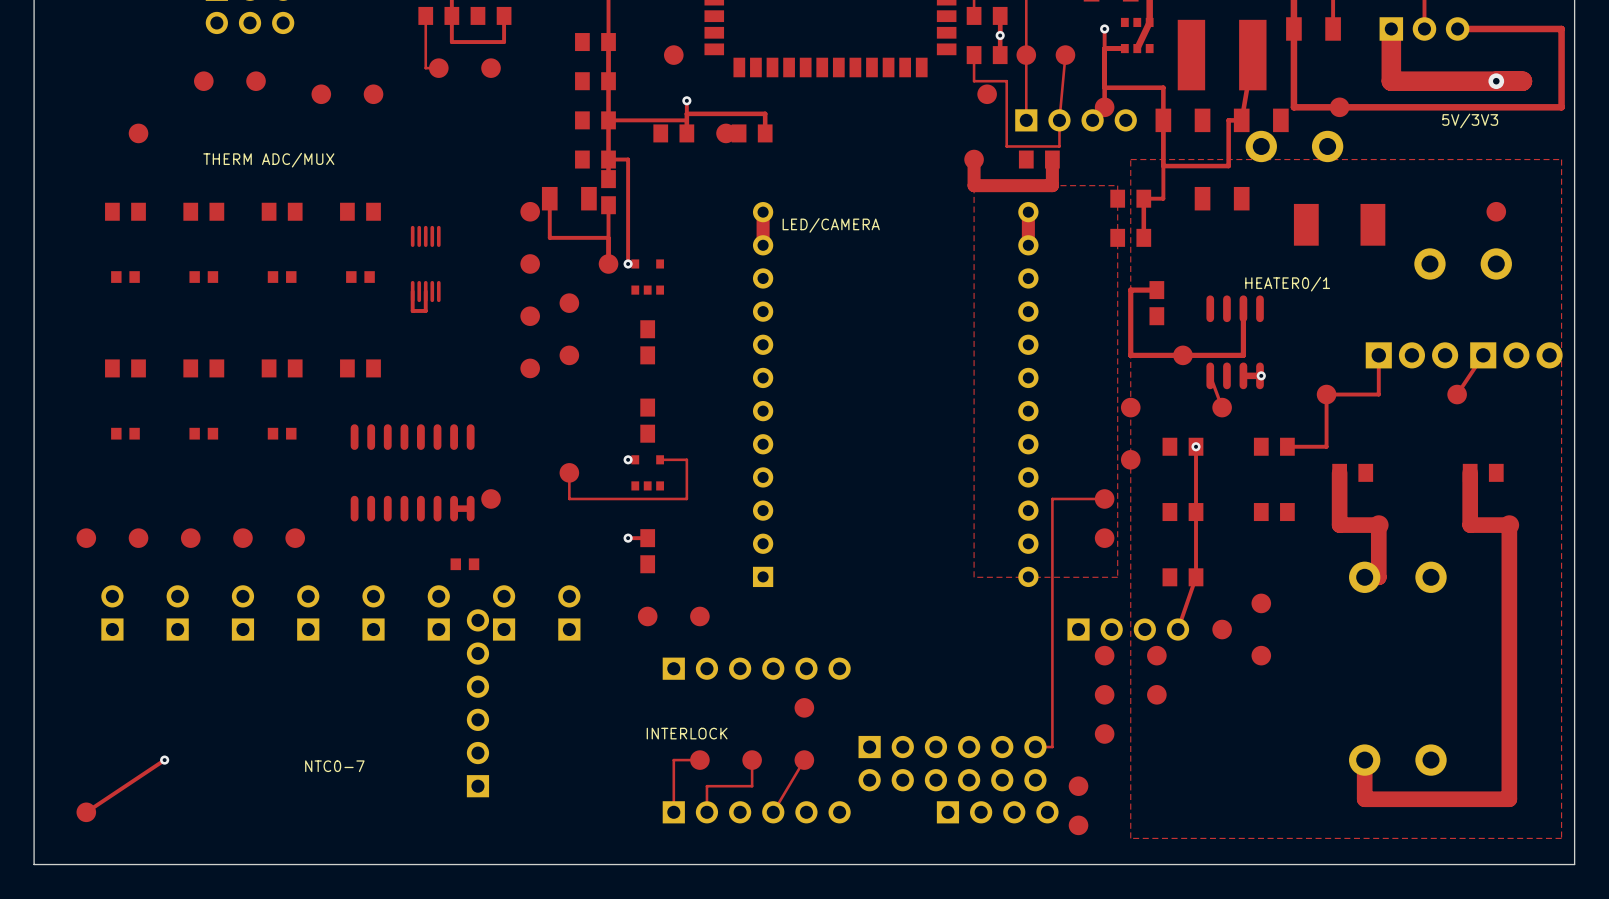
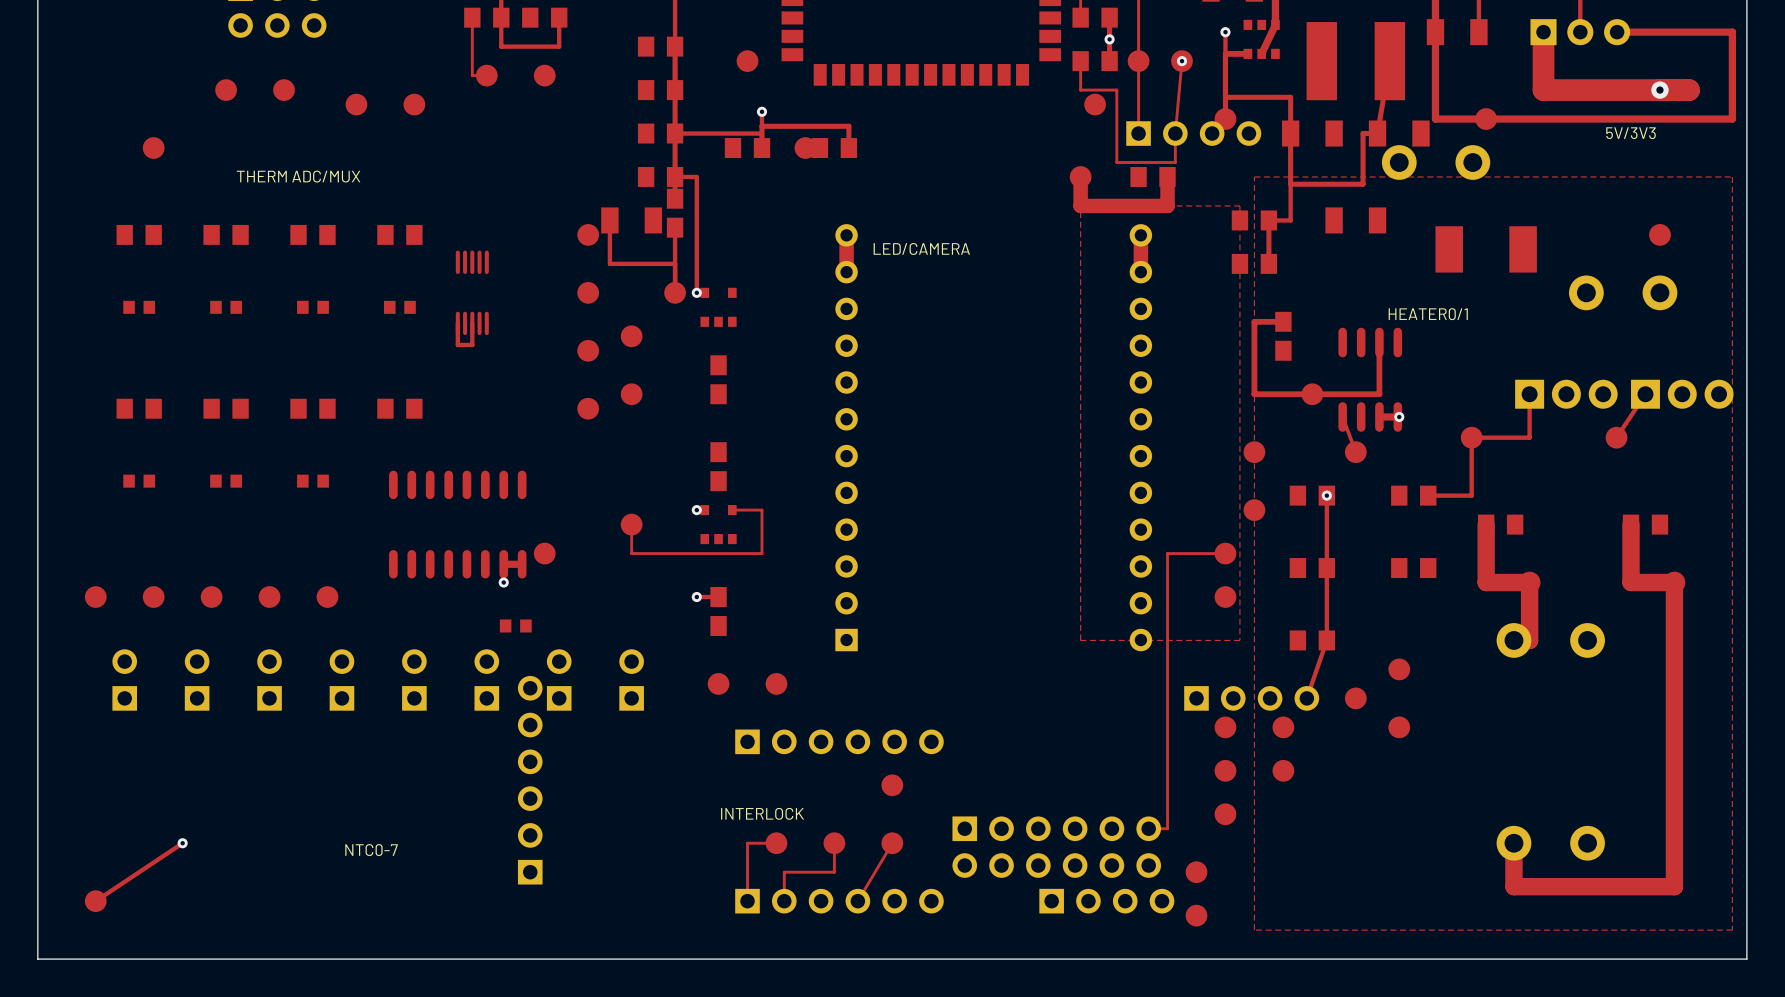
via: none -> (1182, 61)
via: none -> (503, 582)

